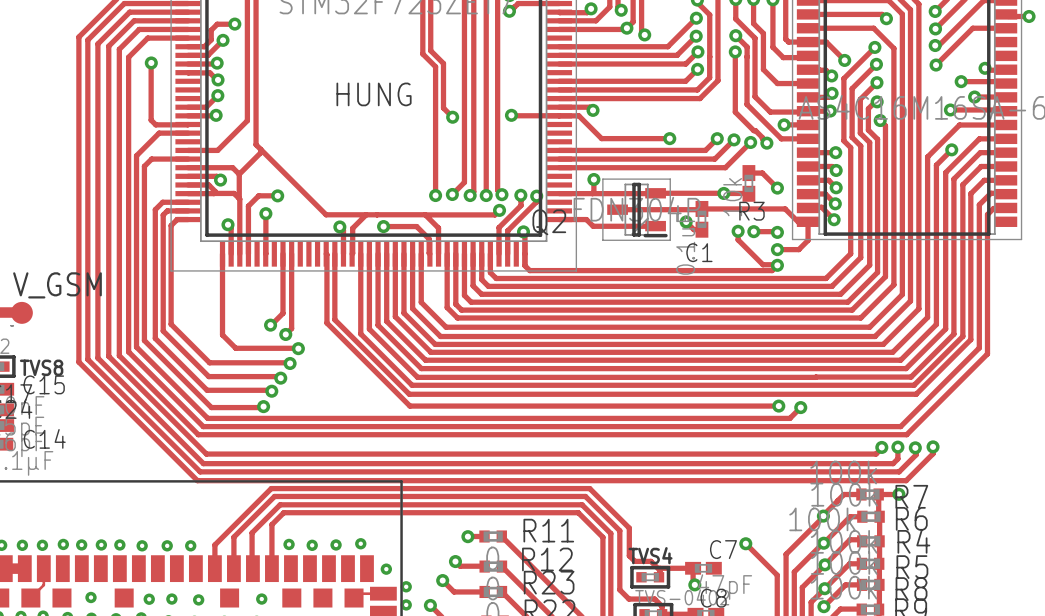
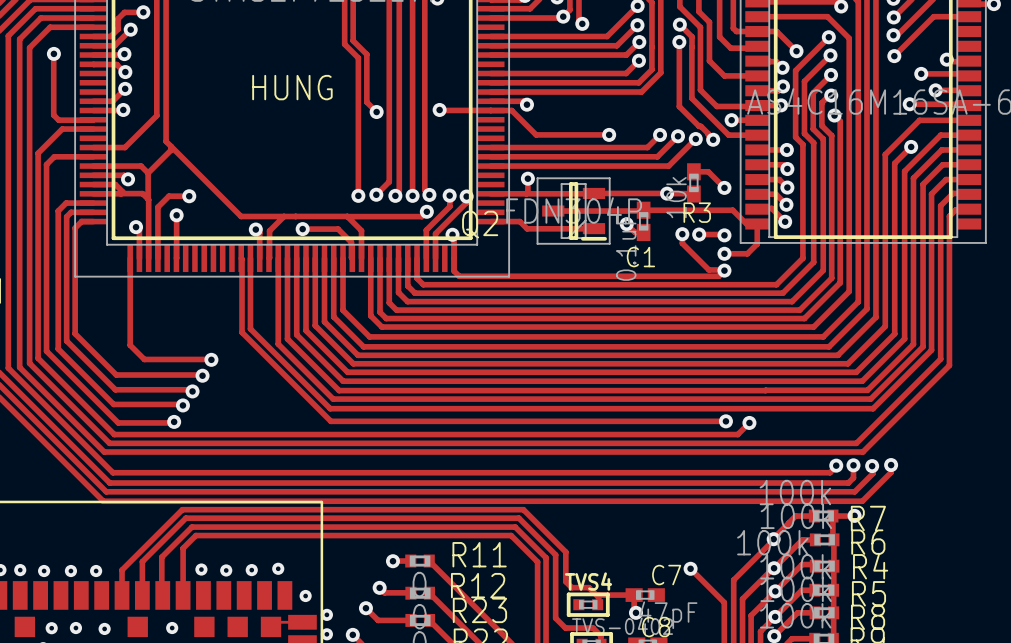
track: (283, 253) (283, 313) (270, 325) -> none
track: (291, 253) (291, 328) (285, 334) -> none
via: (270, 325) -> none
via: (285, 334) -> none

